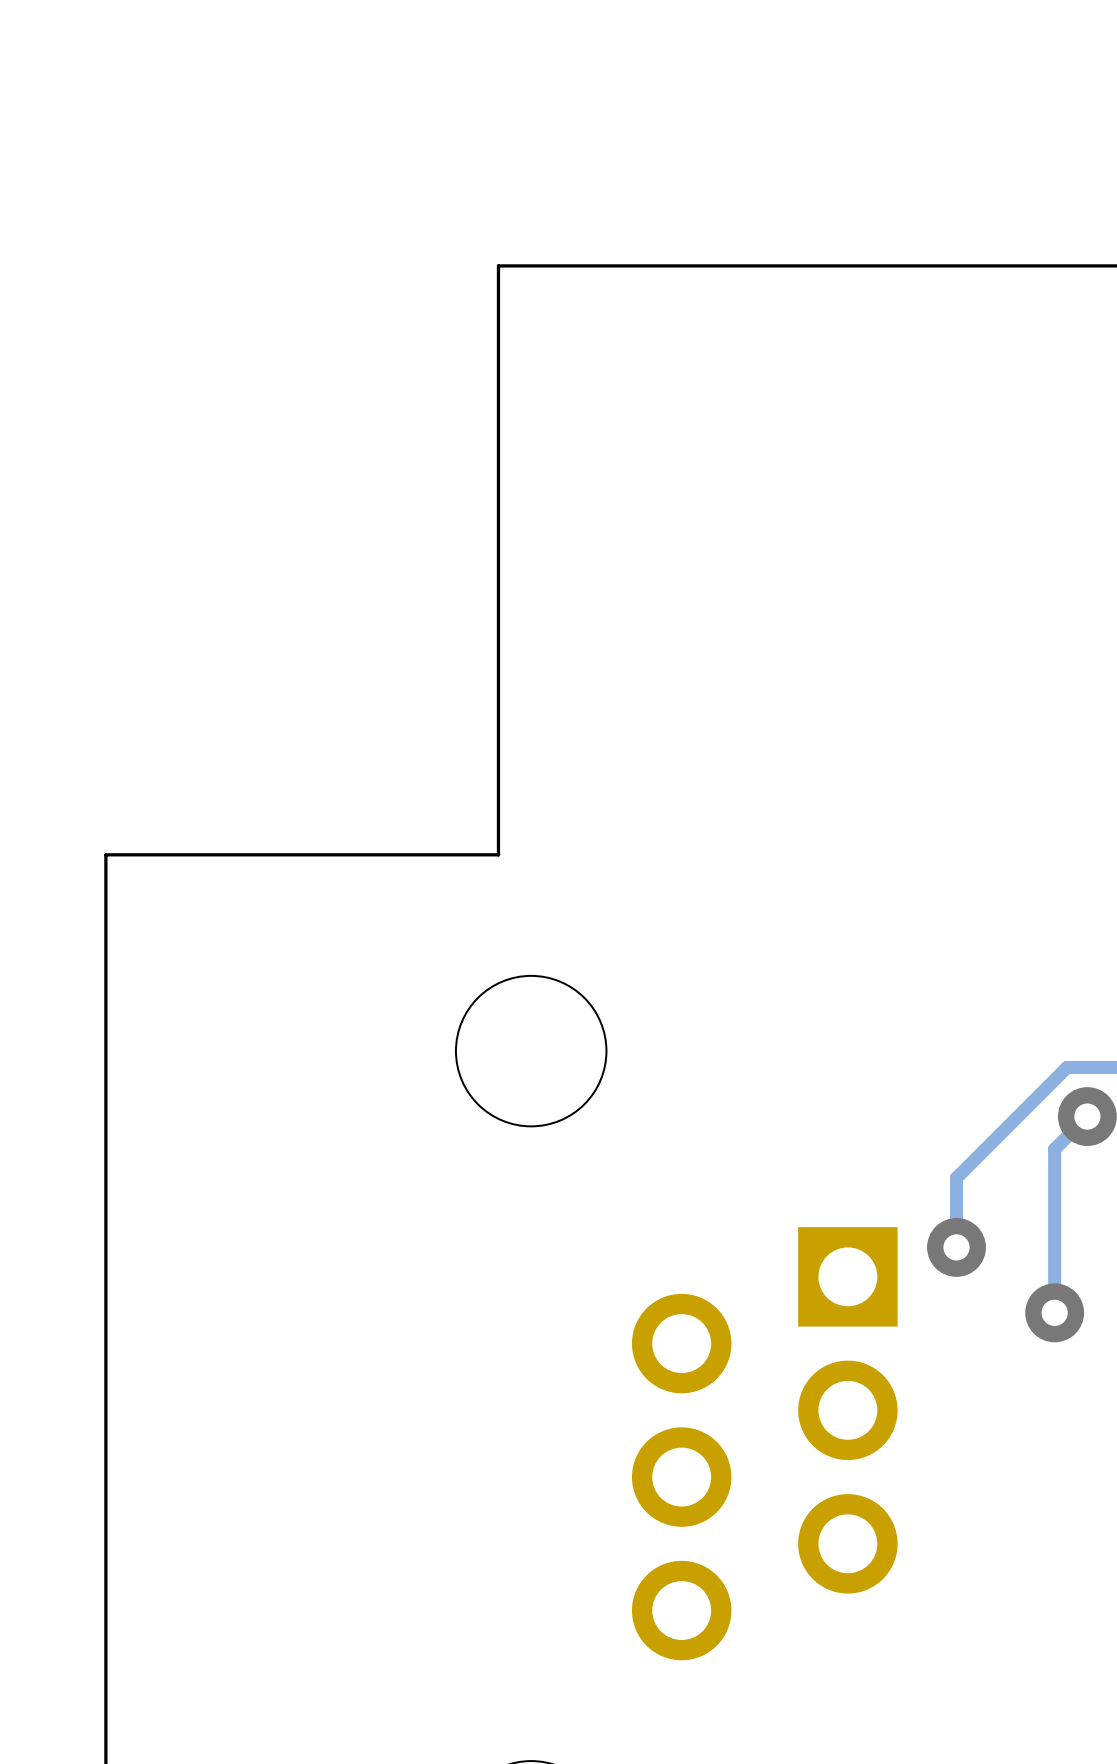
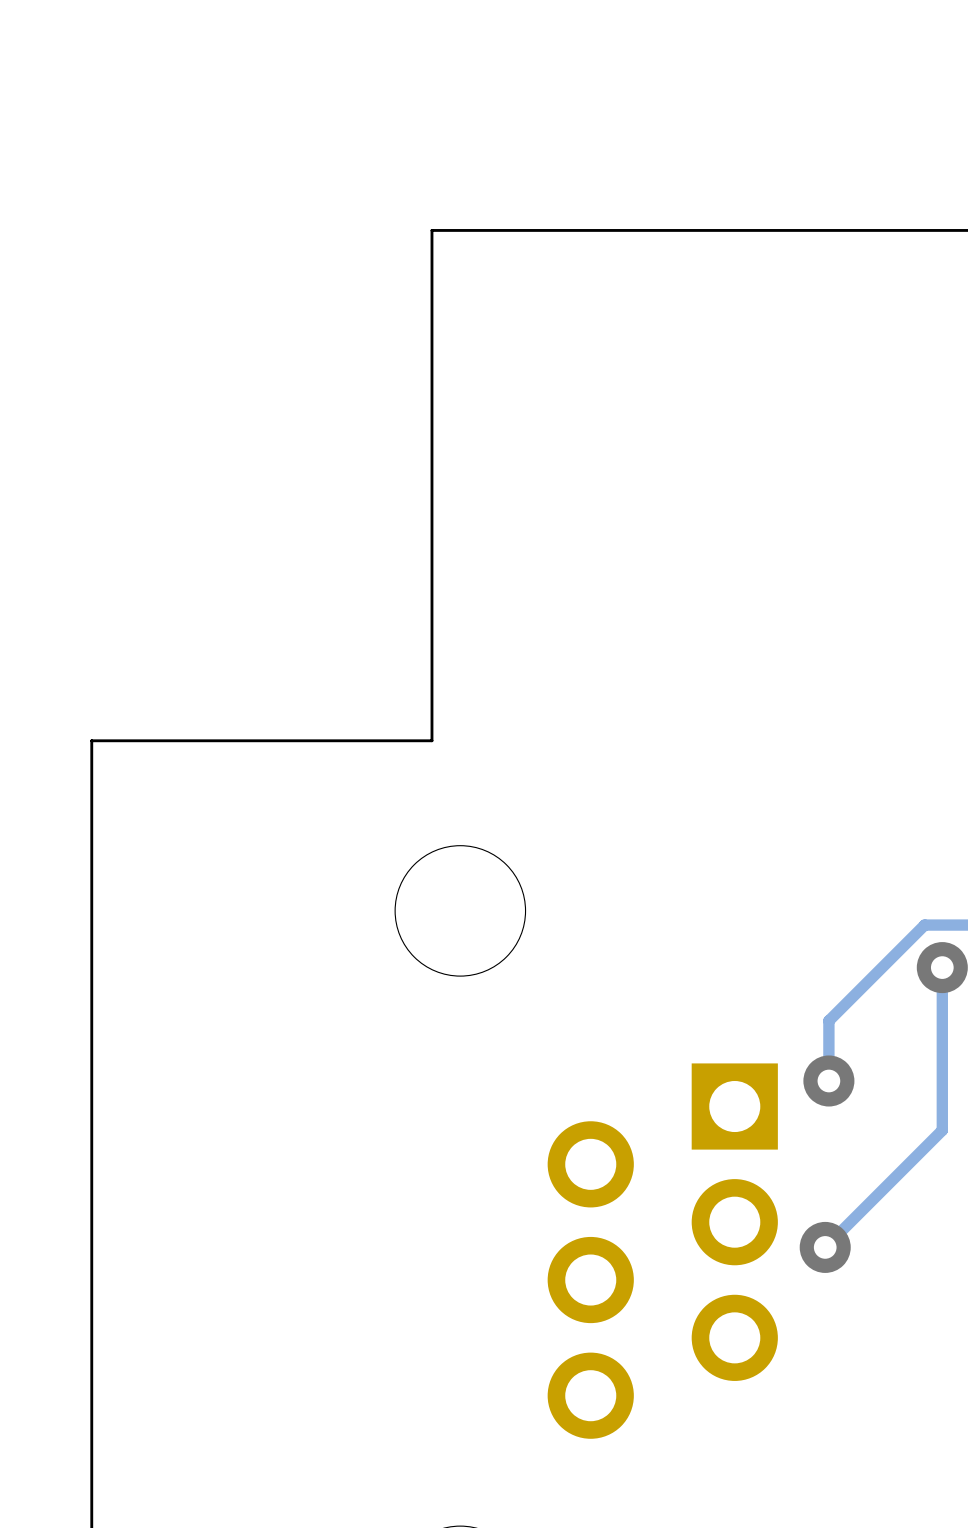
track: (1087, 1116) (1054, 1149) (1054, 1312) -> (942, 967) (942, 1130) (825, 1247)
via position: (1054, 1312) -> (825, 1247)

